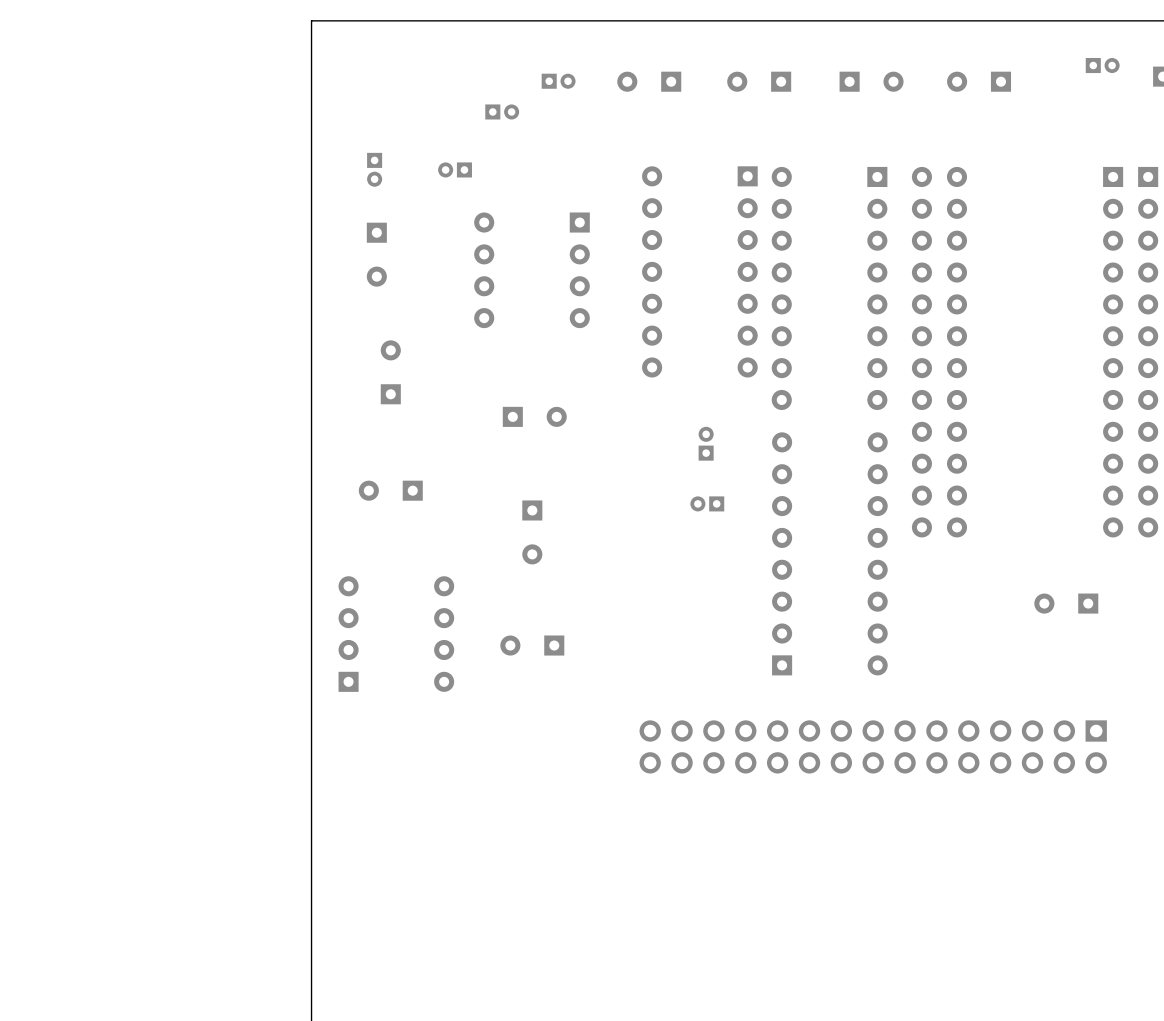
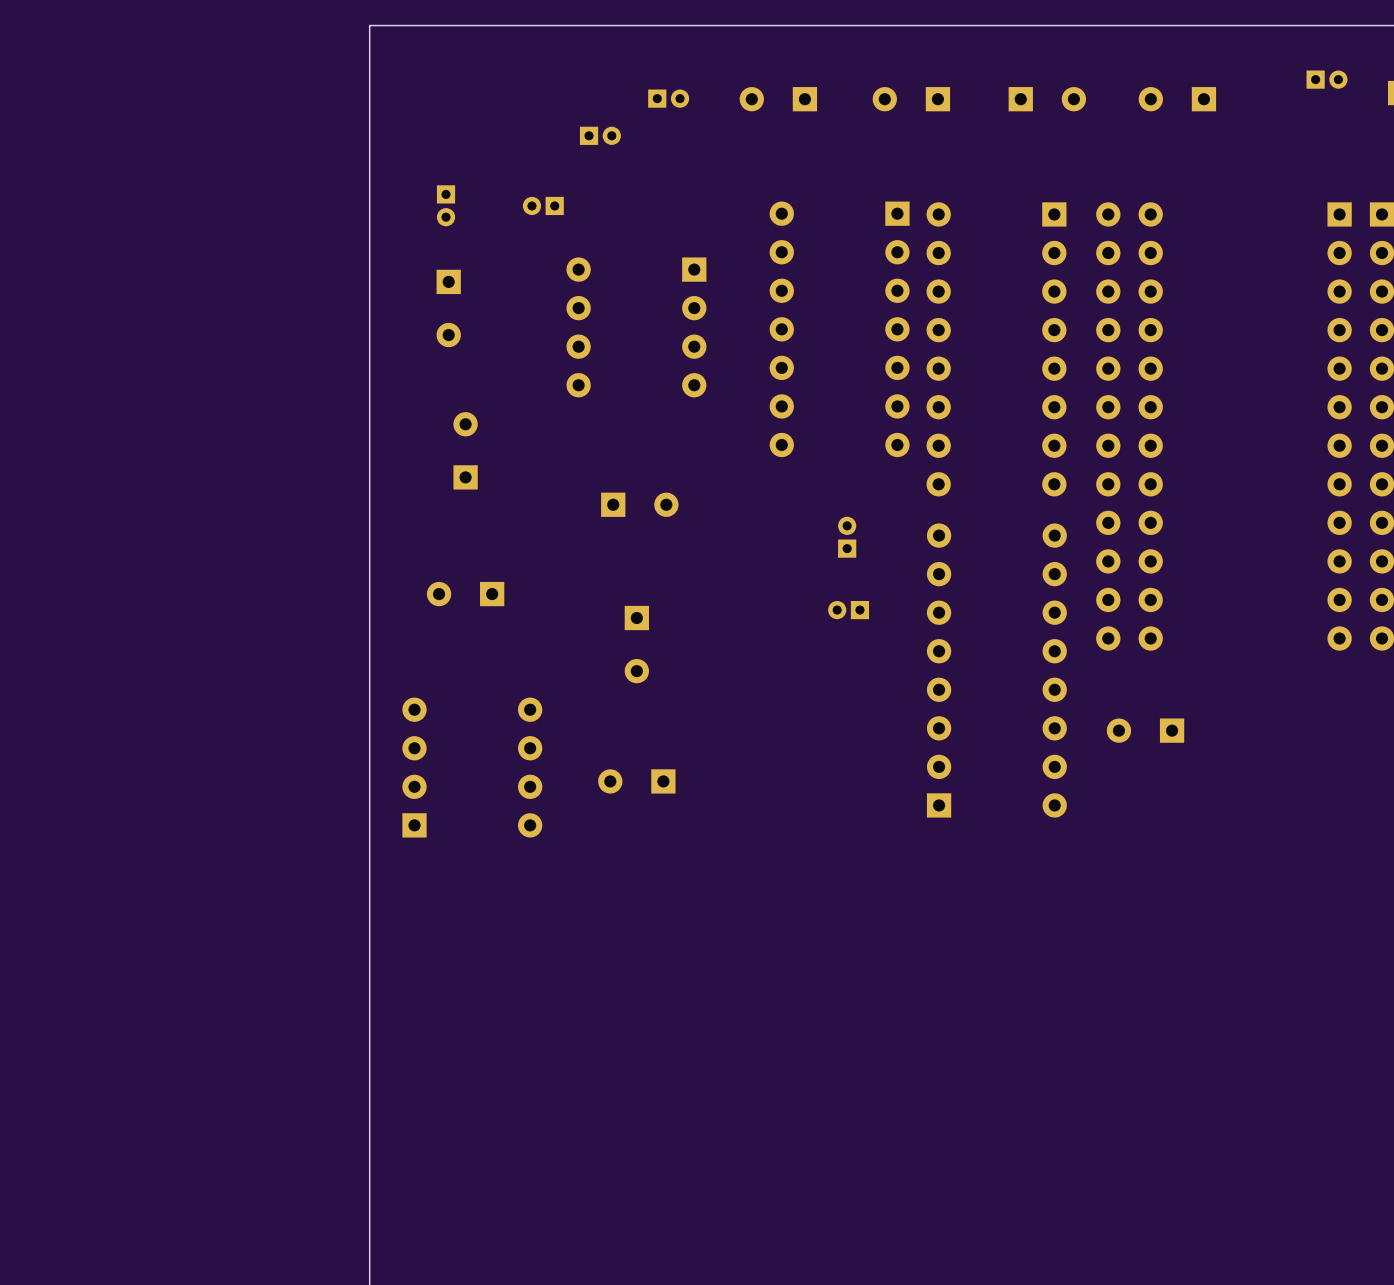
part position: (1066, 603) -> (1145, 730)
part: (873, 746) -> none

